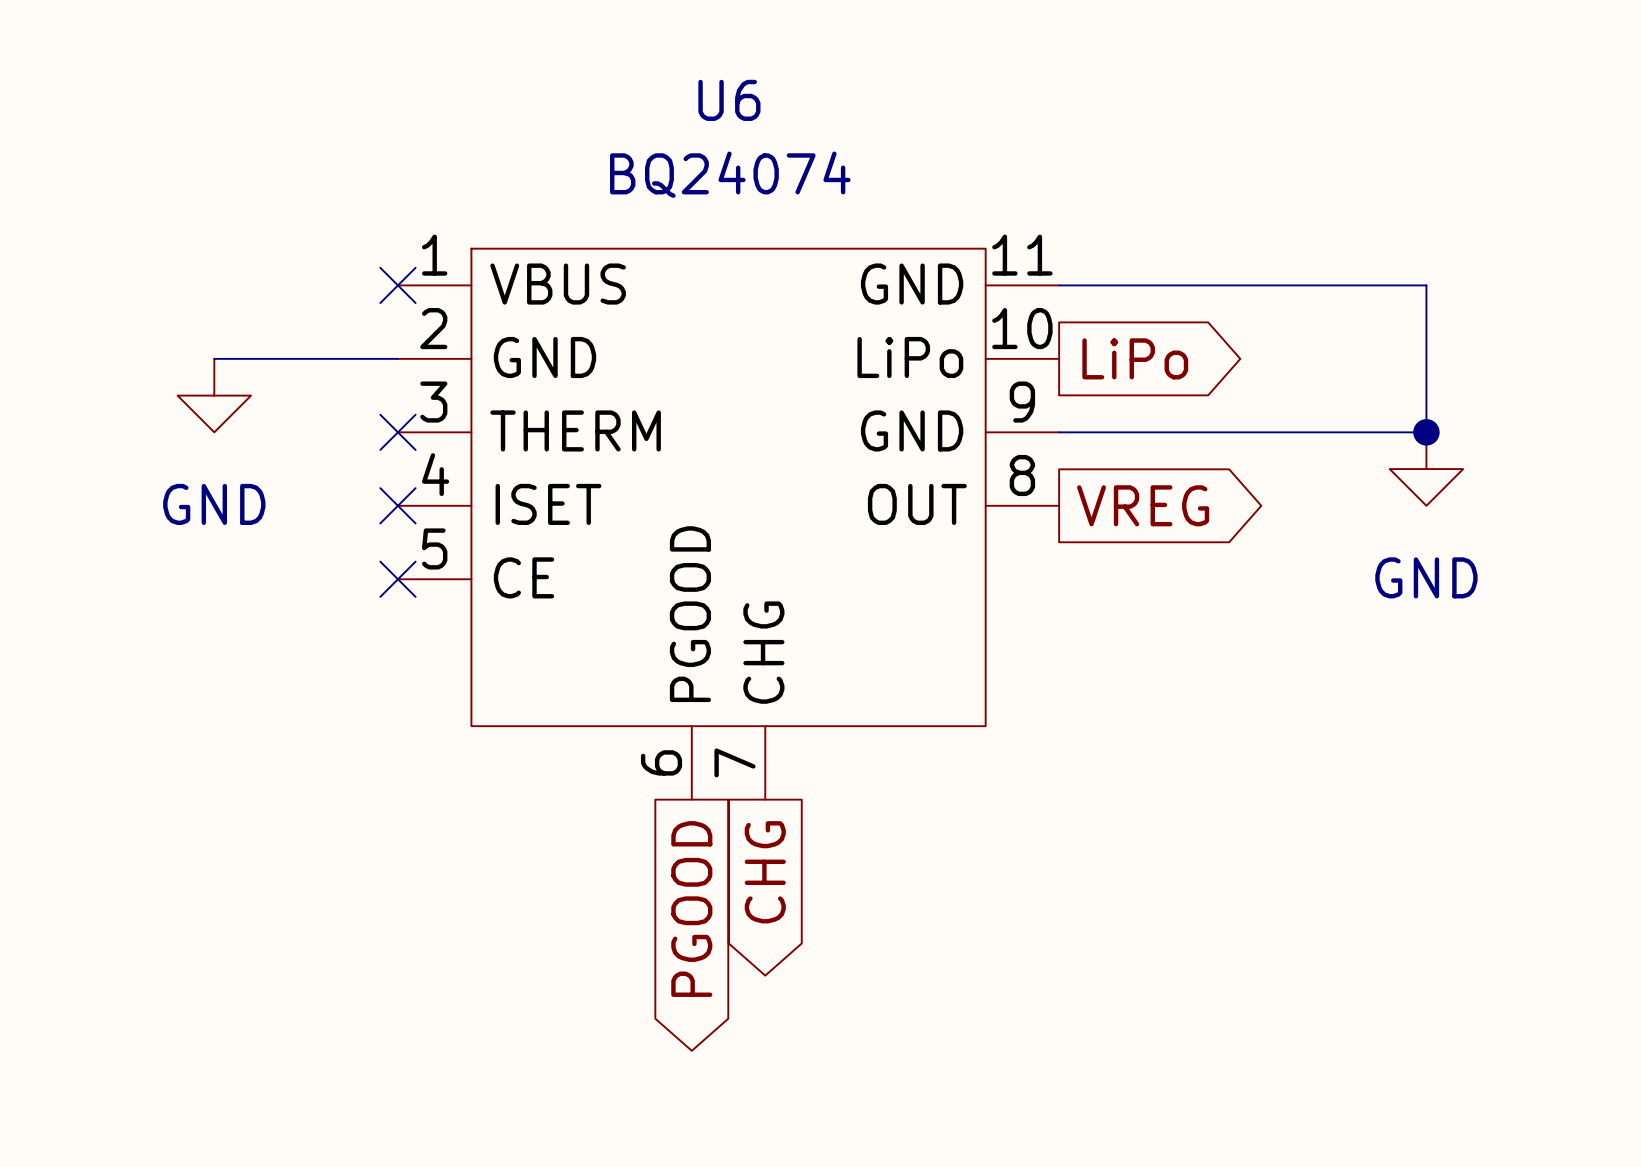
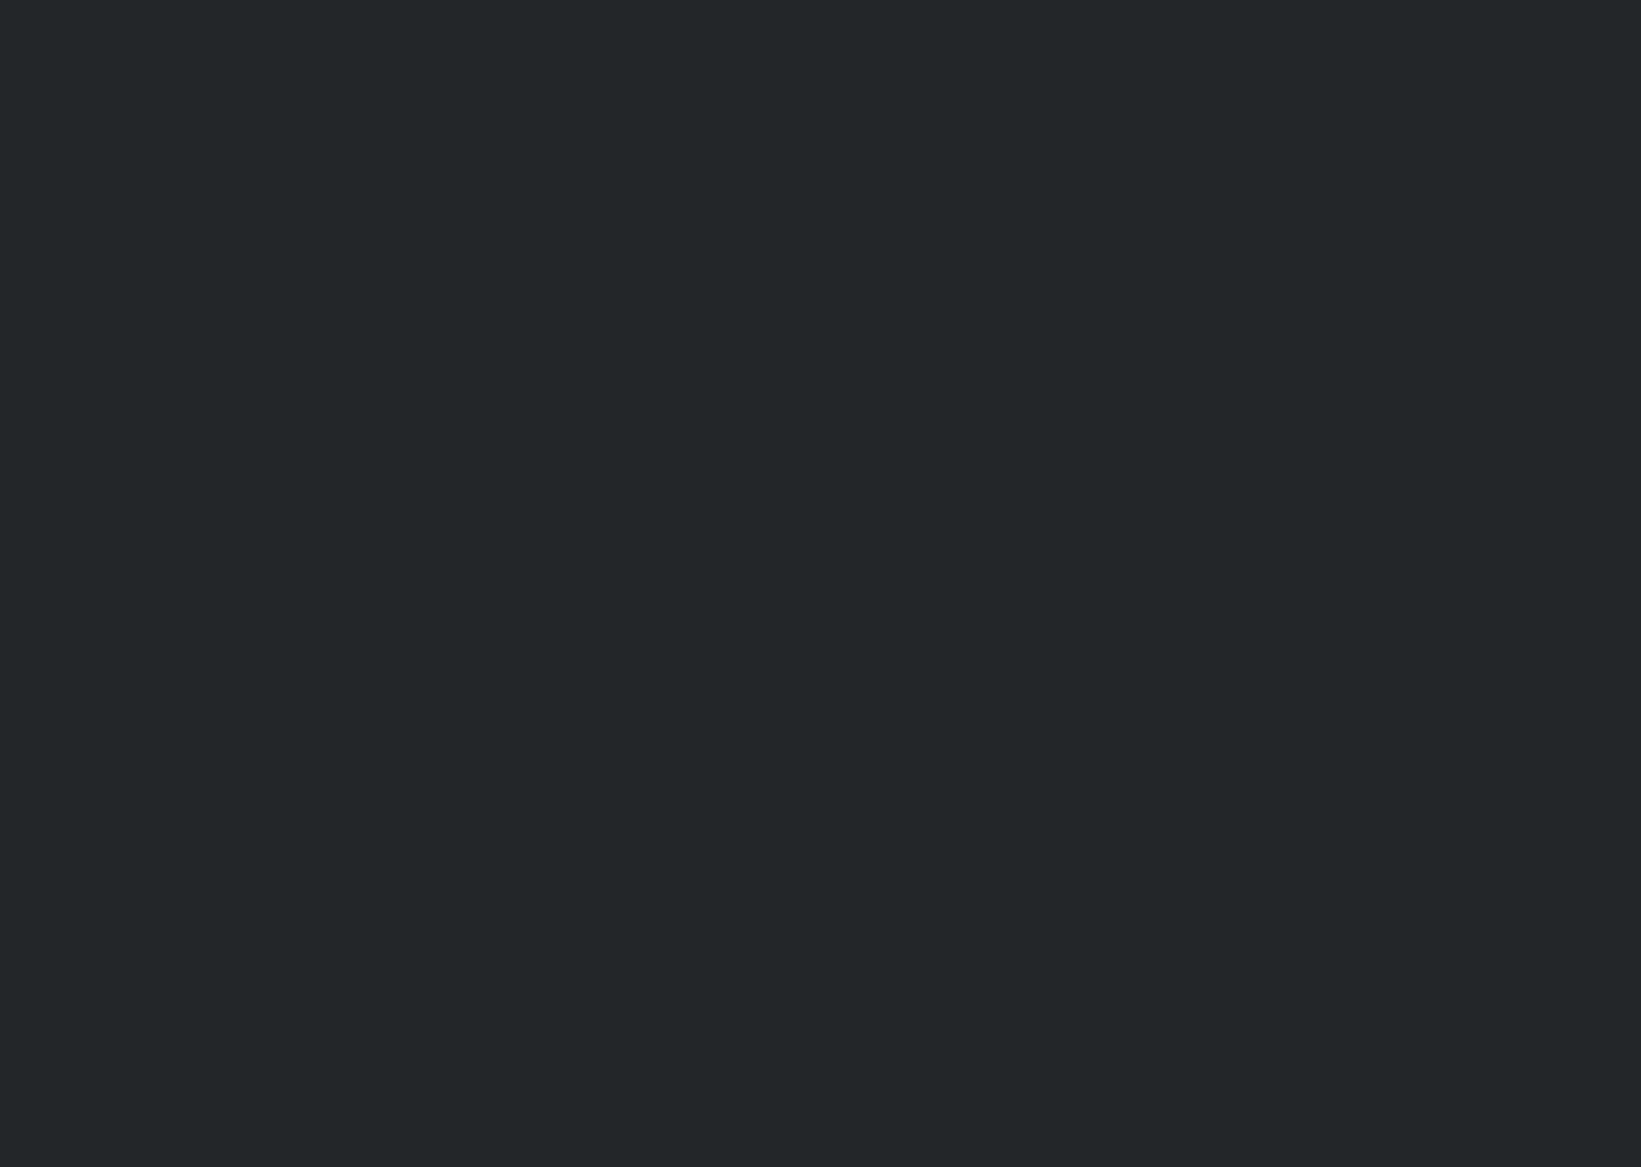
no-connect mark: (397, 285) -> none
wire: (1059, 285) (1426, 285) (1426, 432) (1059, 432) -> none
wire: (214, 358) (397, 358) -> none
global label: LiPo (1135, 358) -> none
power symbol: GND (214, 395) -> none
no-connect mark: (397, 432) -> none
junction: (1426, 432) -> none
power symbol: GND (1426, 469) -> none
no-connect mark: (397, 505) -> none
global label: VREG (1143, 505) -> none
U6: BQ24074 (728, 524) -> none
no-connect mark: (397, 579) -> none
global label: CHG (765, 872) -> none
global label: PGOOD (691, 909) -> none

